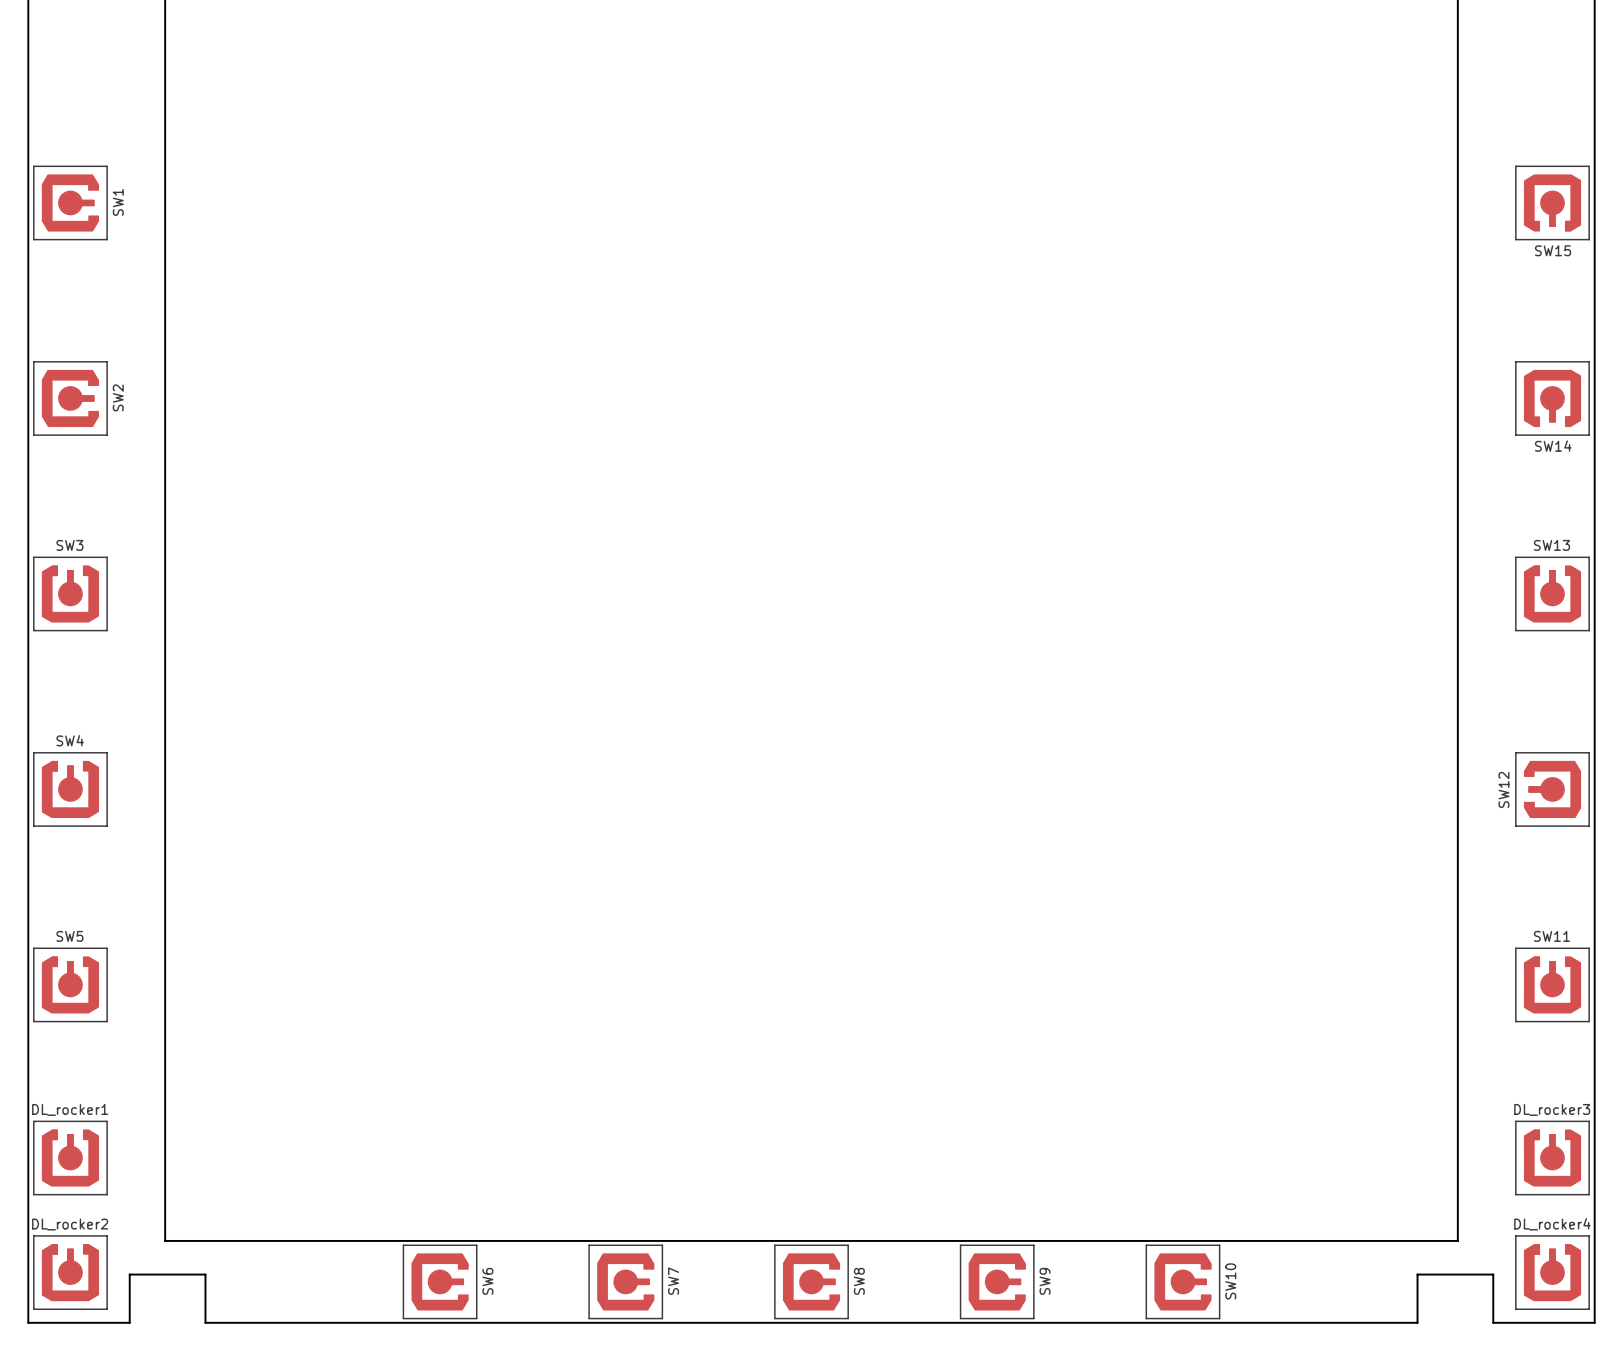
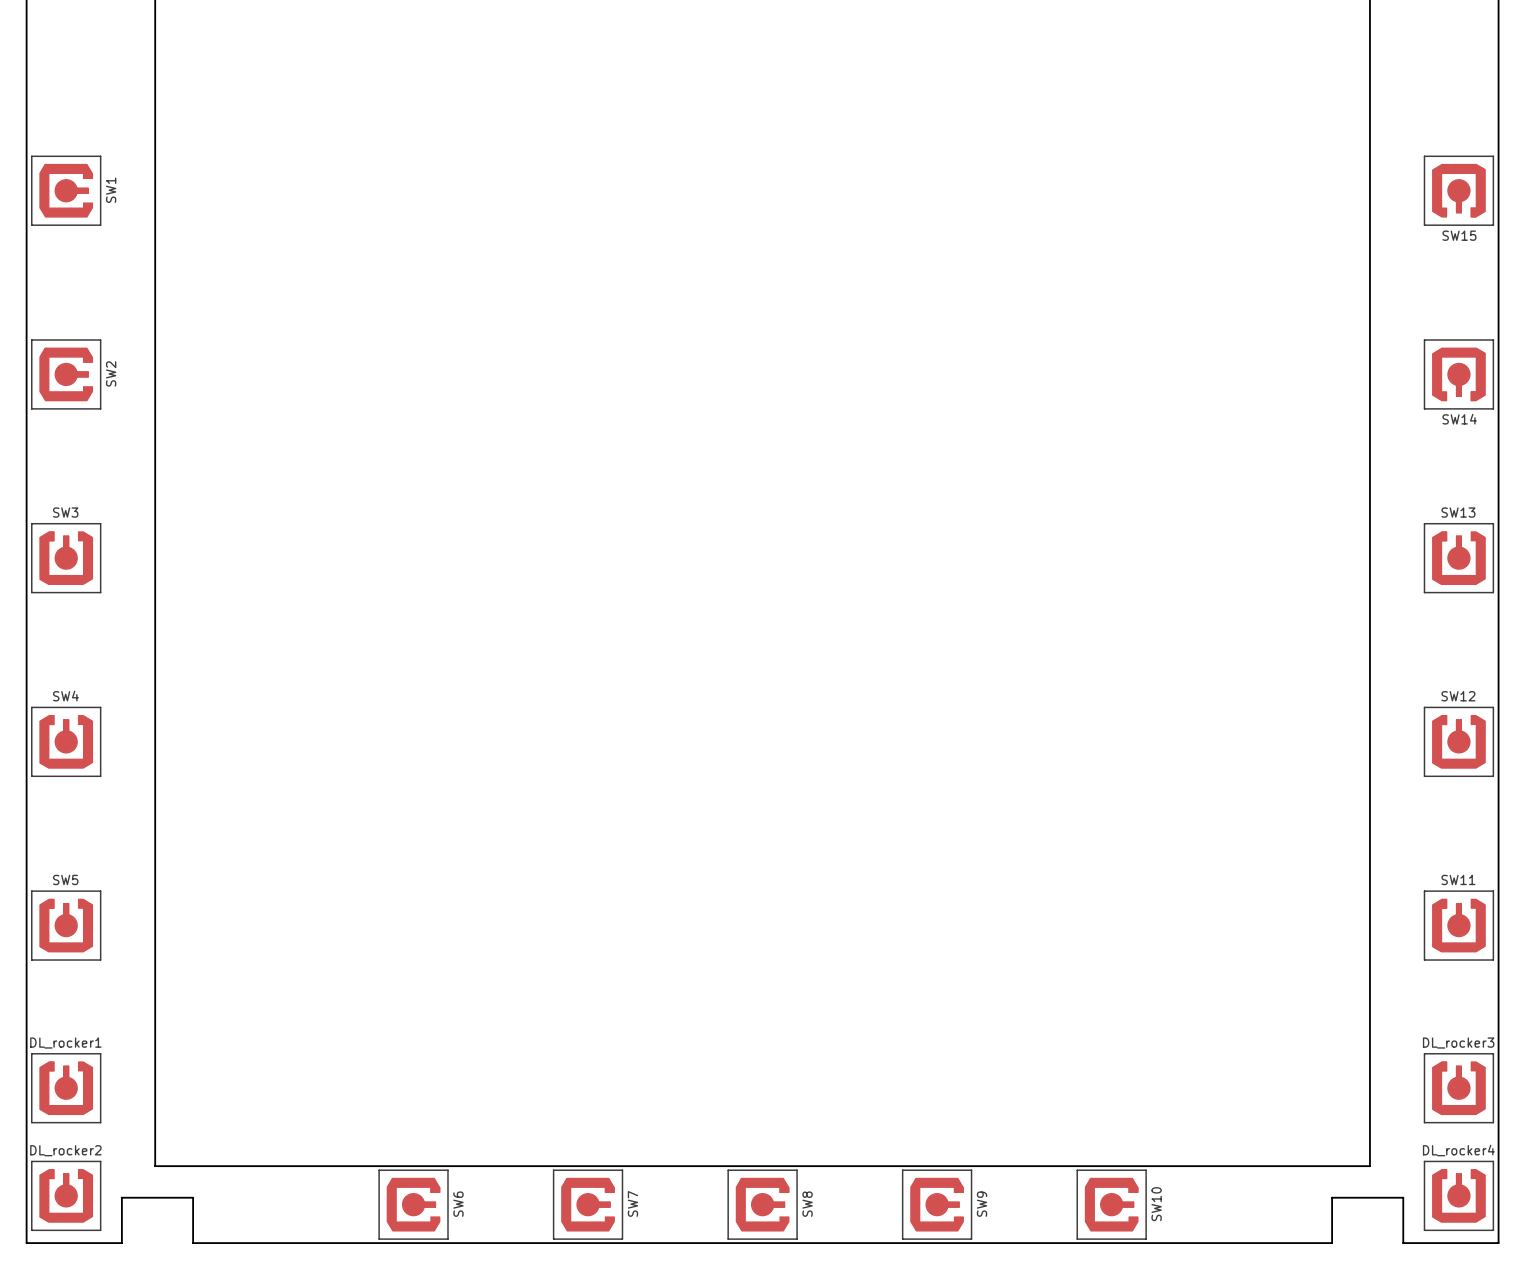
SW12 rotation: 0° (1552, 789) -> 90° clockwise (1458, 741)

